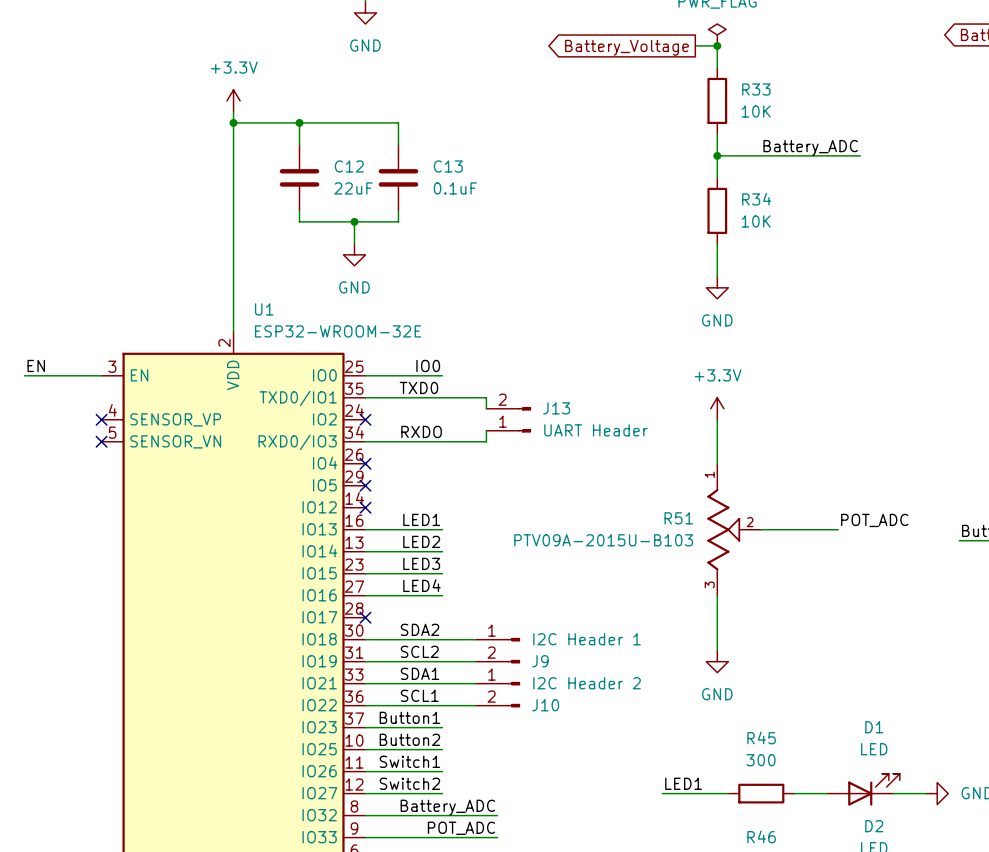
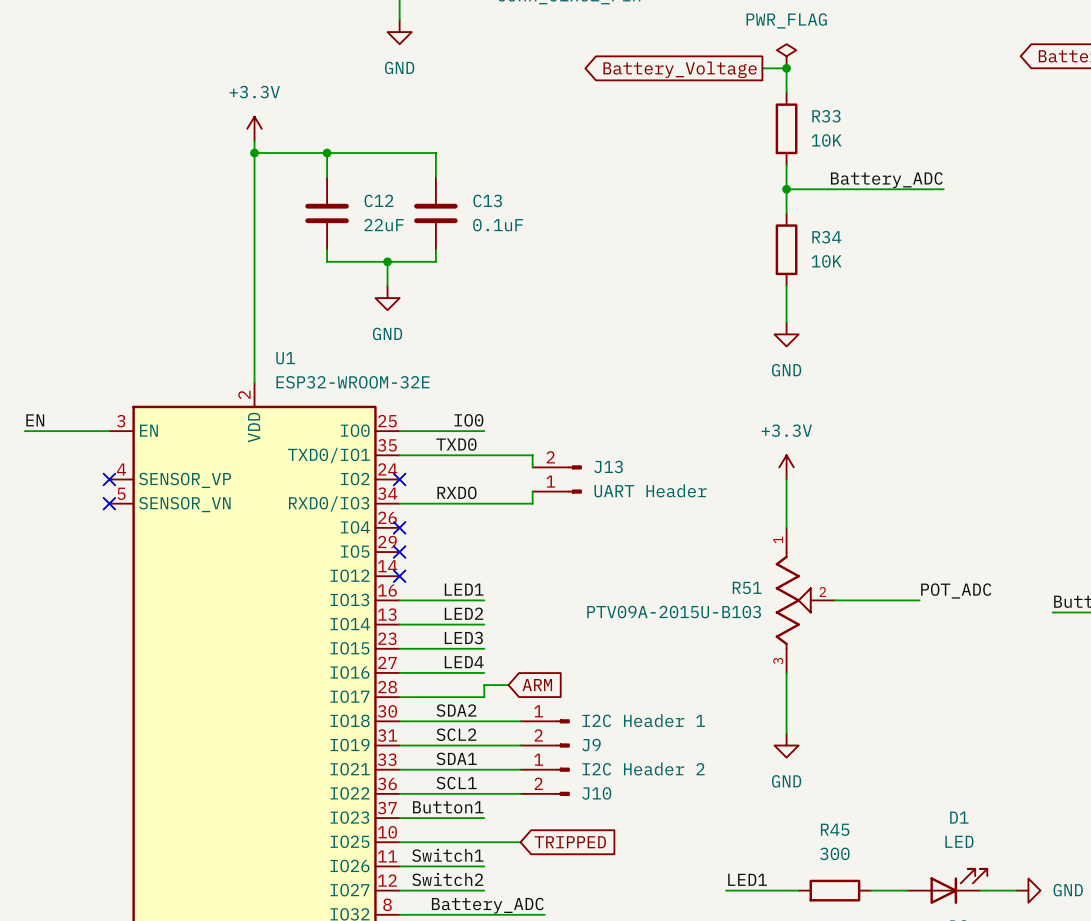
wire: none -> (508, 685) (484, 685) (484, 697) (399, 697)
global label: none -> ARM (537, 685)
no-connect mark: (365, 617) -> none
label: Button2 (409, 739) -> none
wire: none -> (484, 842) (520, 842)
global label: none -> TRIPPED (570, 842)

